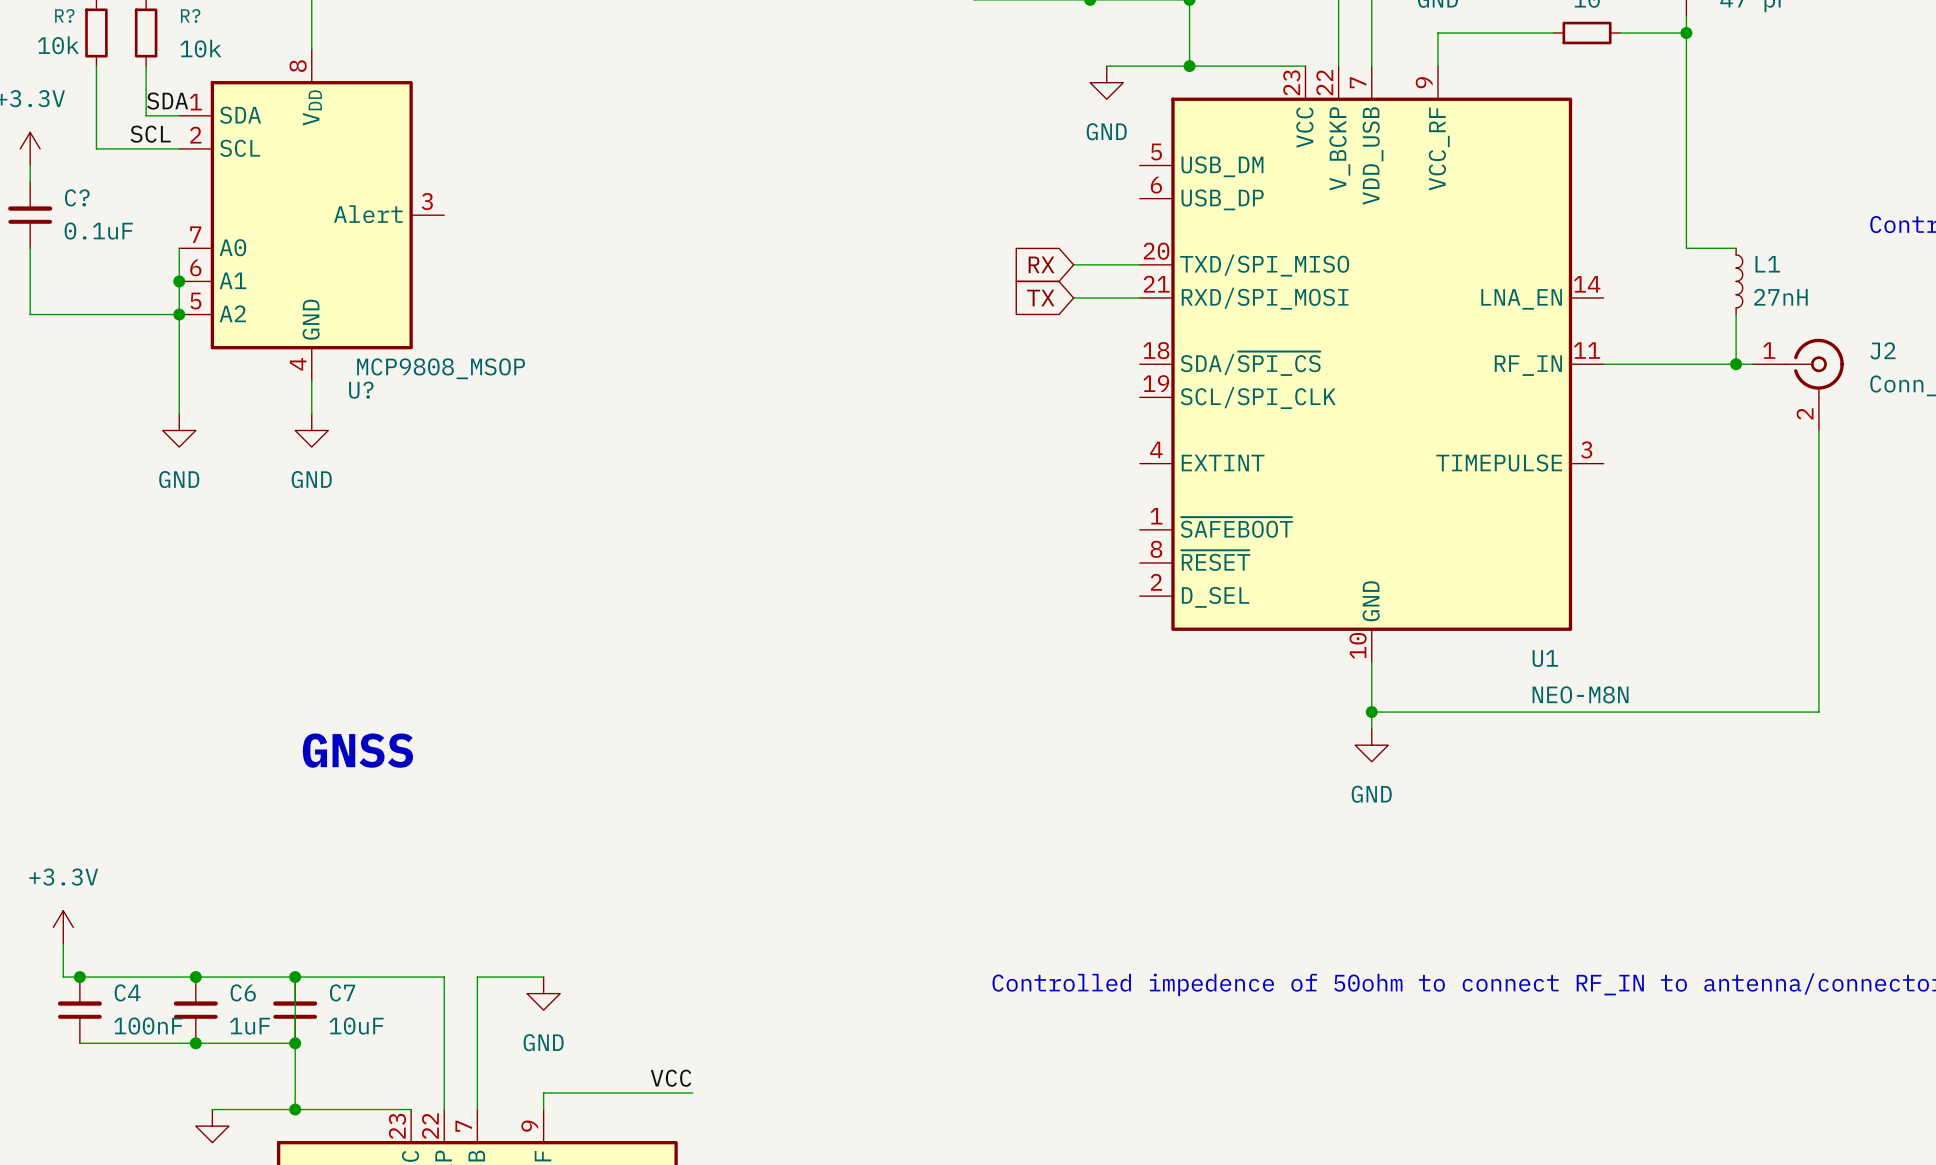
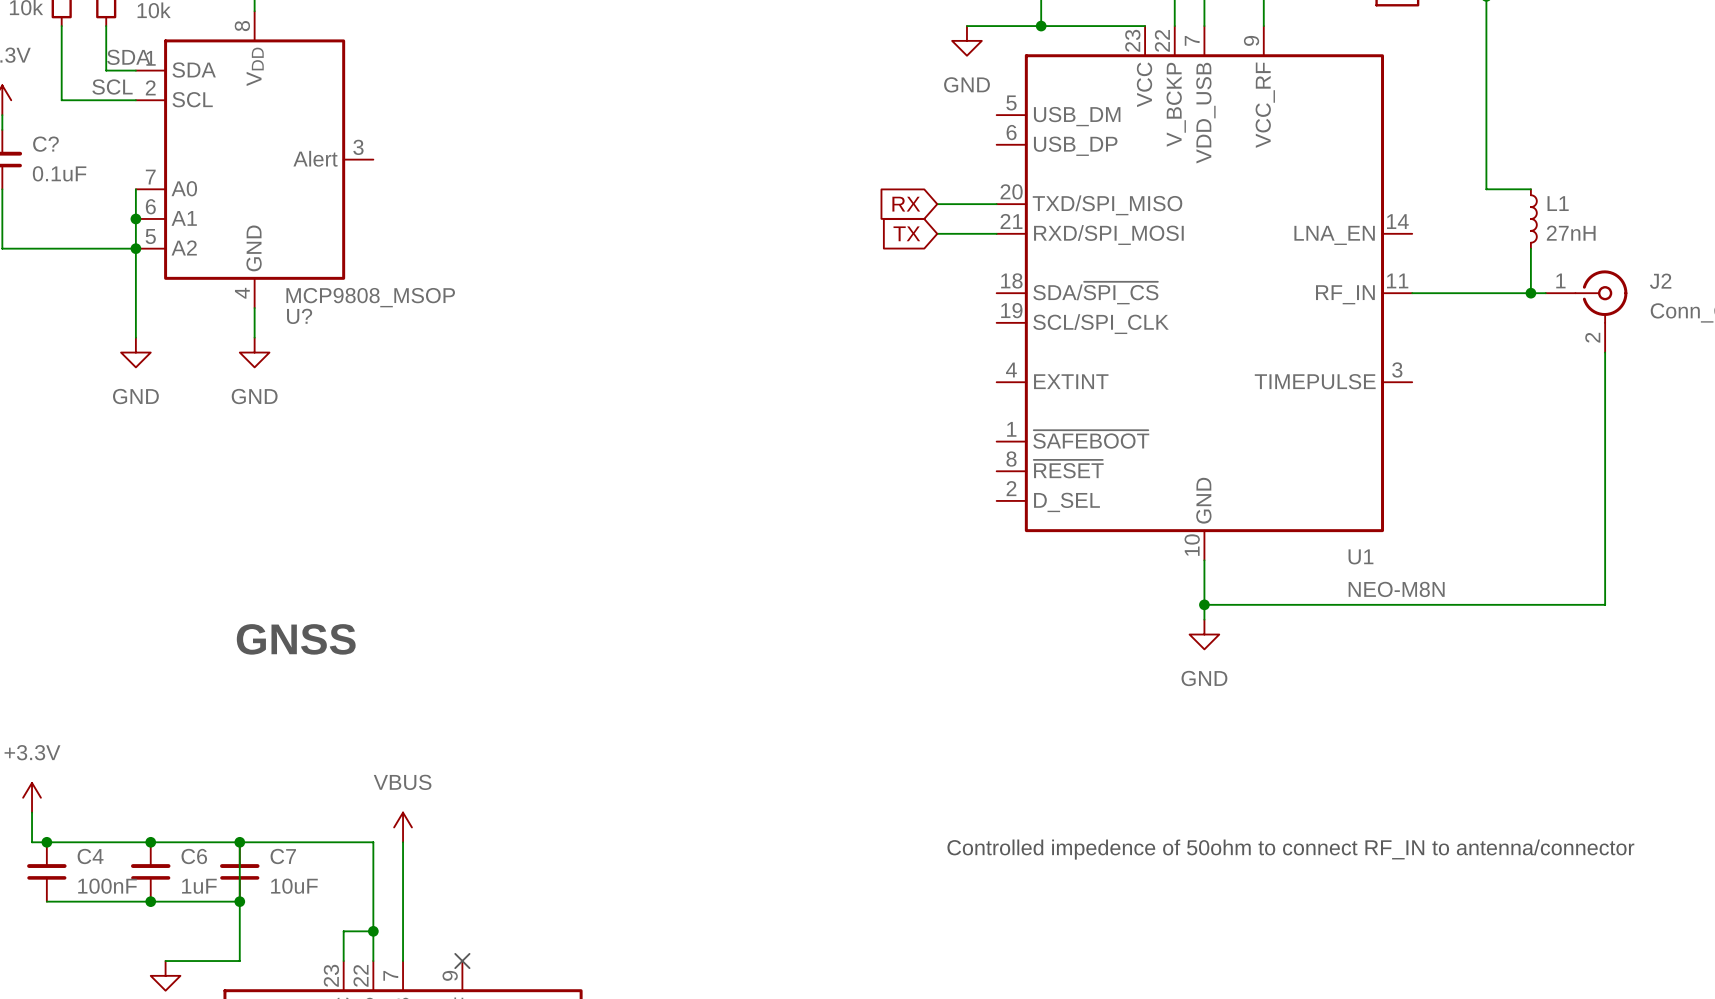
power symbol: none -> VBUS (403, 827)
wire: (477, 977) (543, 977) -> none
power symbol: GND (543, 993) -> none
junction: none -> (373, 931)
label: VCC (671, 1078) -> none
wire: (692, 1092) (543, 1092) (543, 1109) -> none
wire: (295, 1109) (411, 1109) -> (373, 931) (343, 931) (343, 961)
junction: (295, 1109) -> none
no-connect mark: none -> (462, 961)

